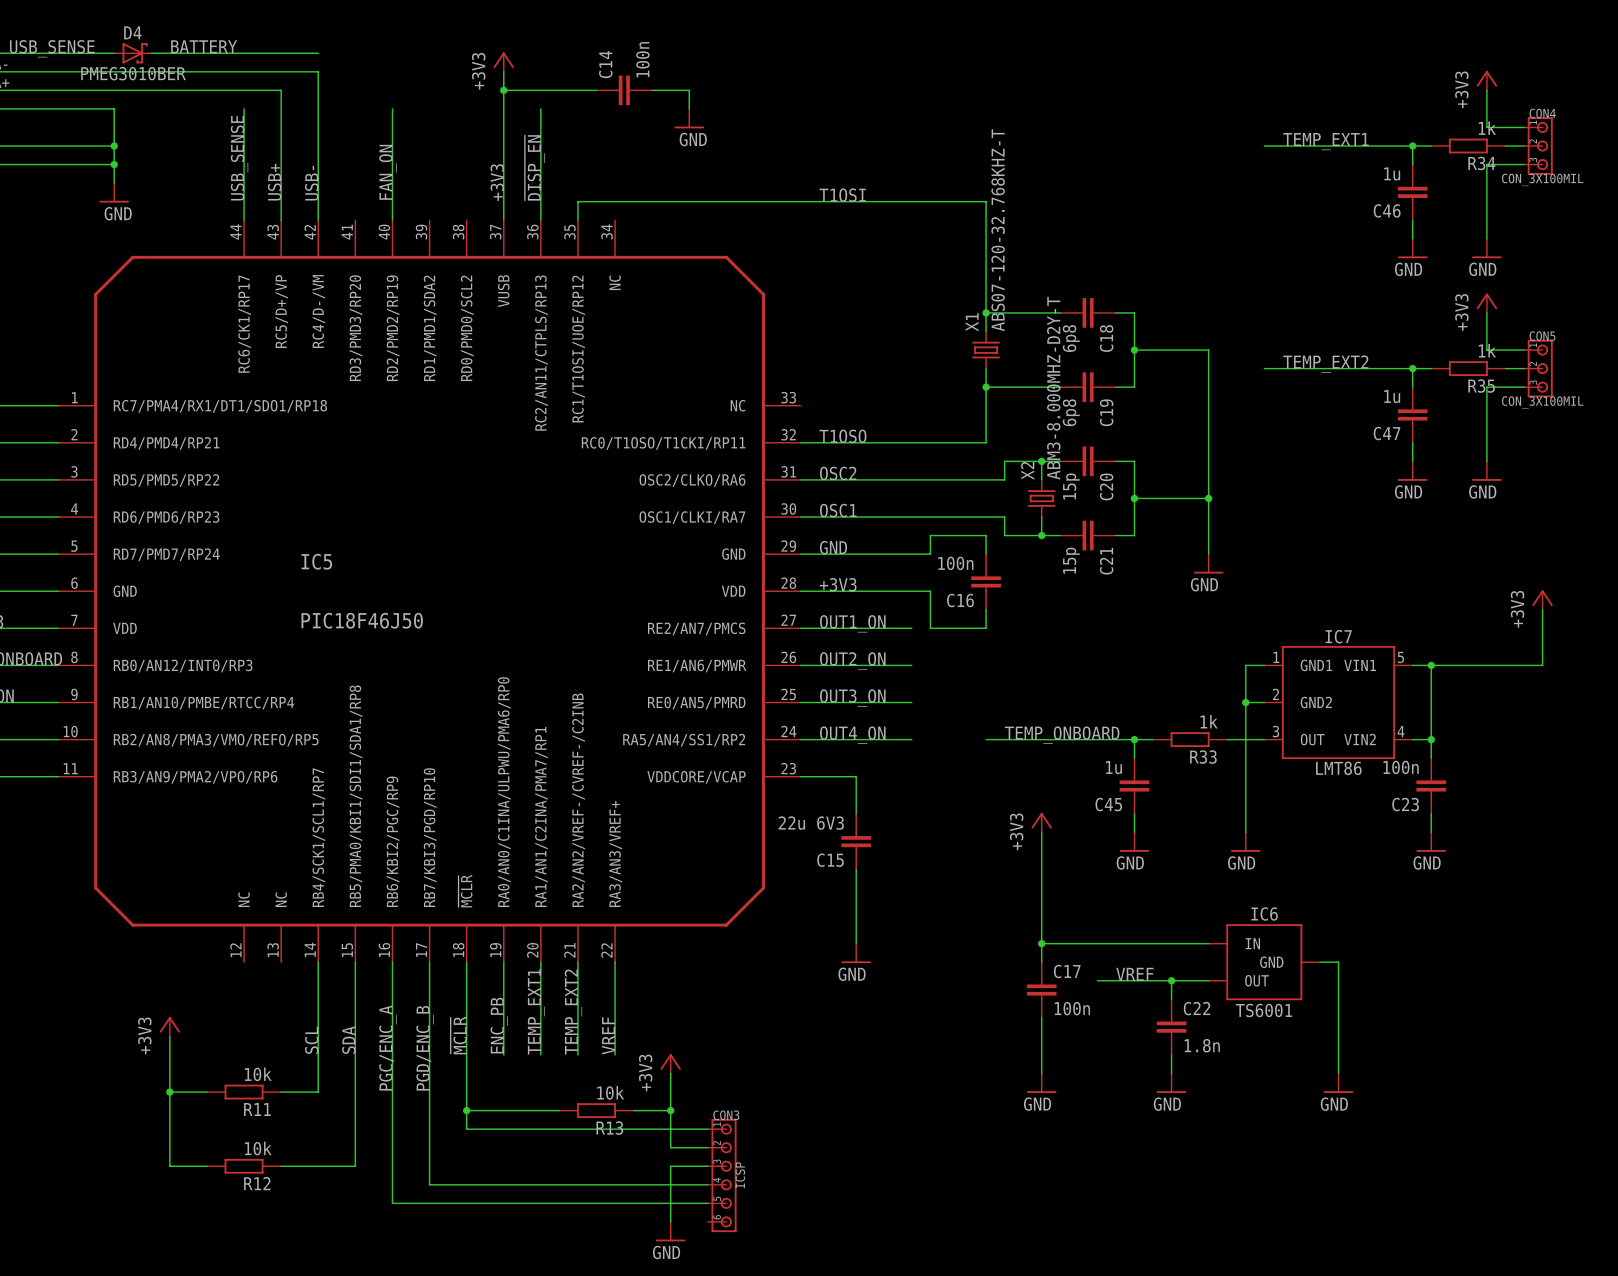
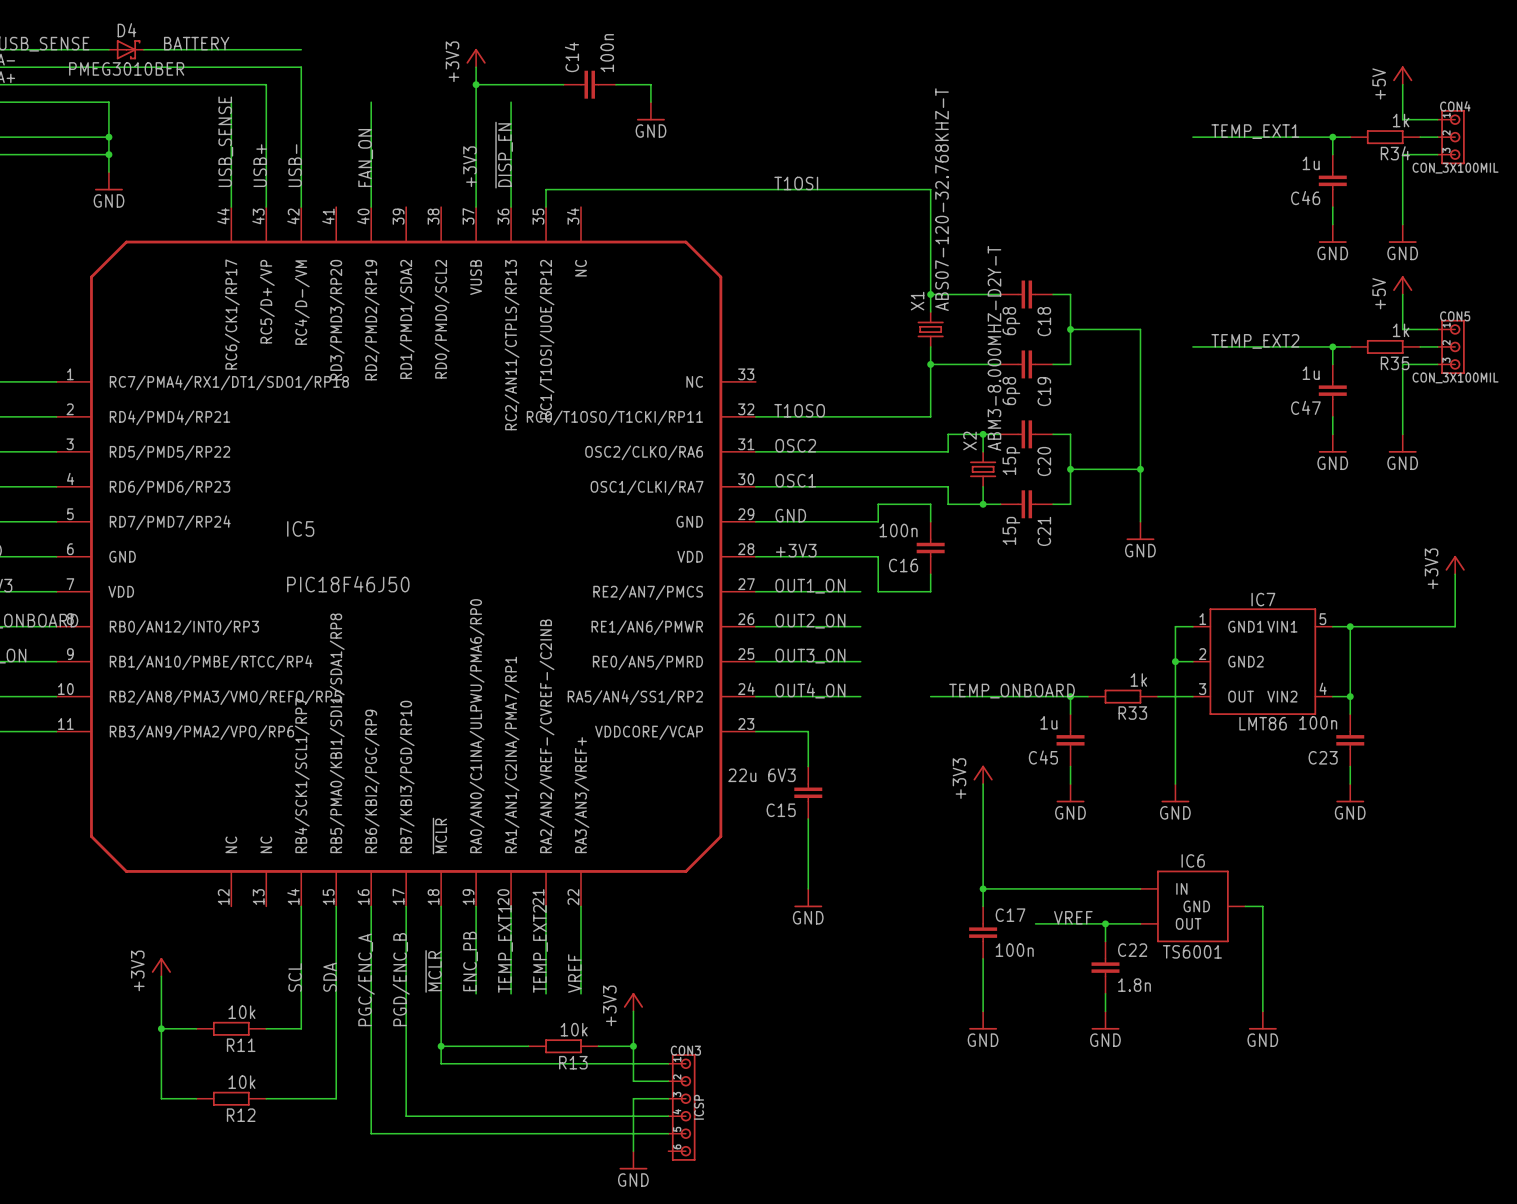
power symbol: +3V3 (1486, 80) -> +5V (1402, 75)
power symbol: +3V3 (1486, 303) -> +5V (1402, 285)

